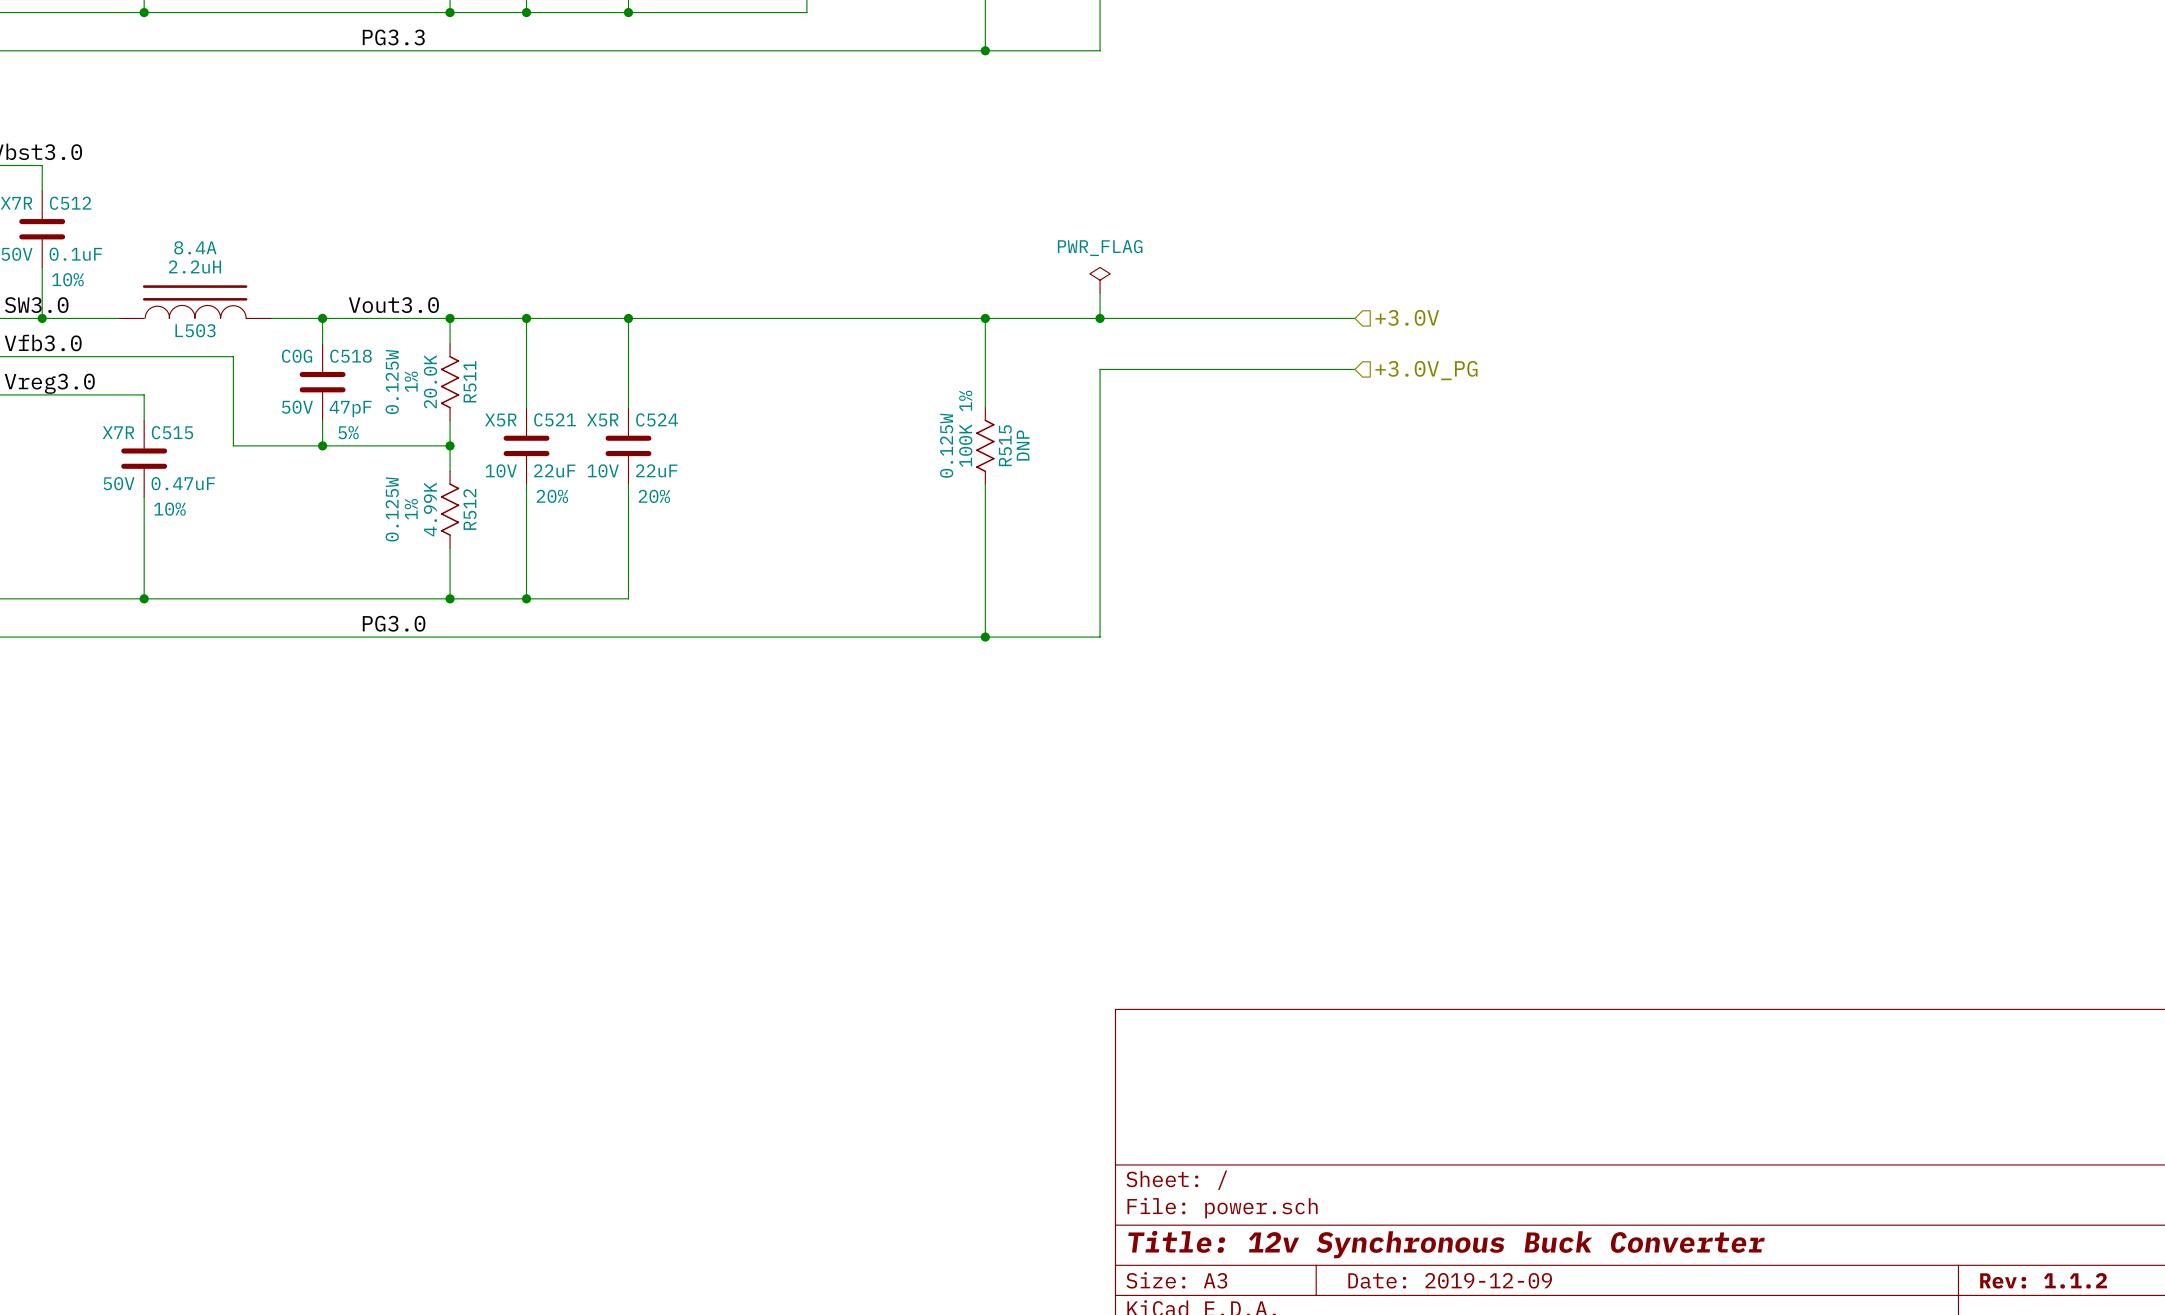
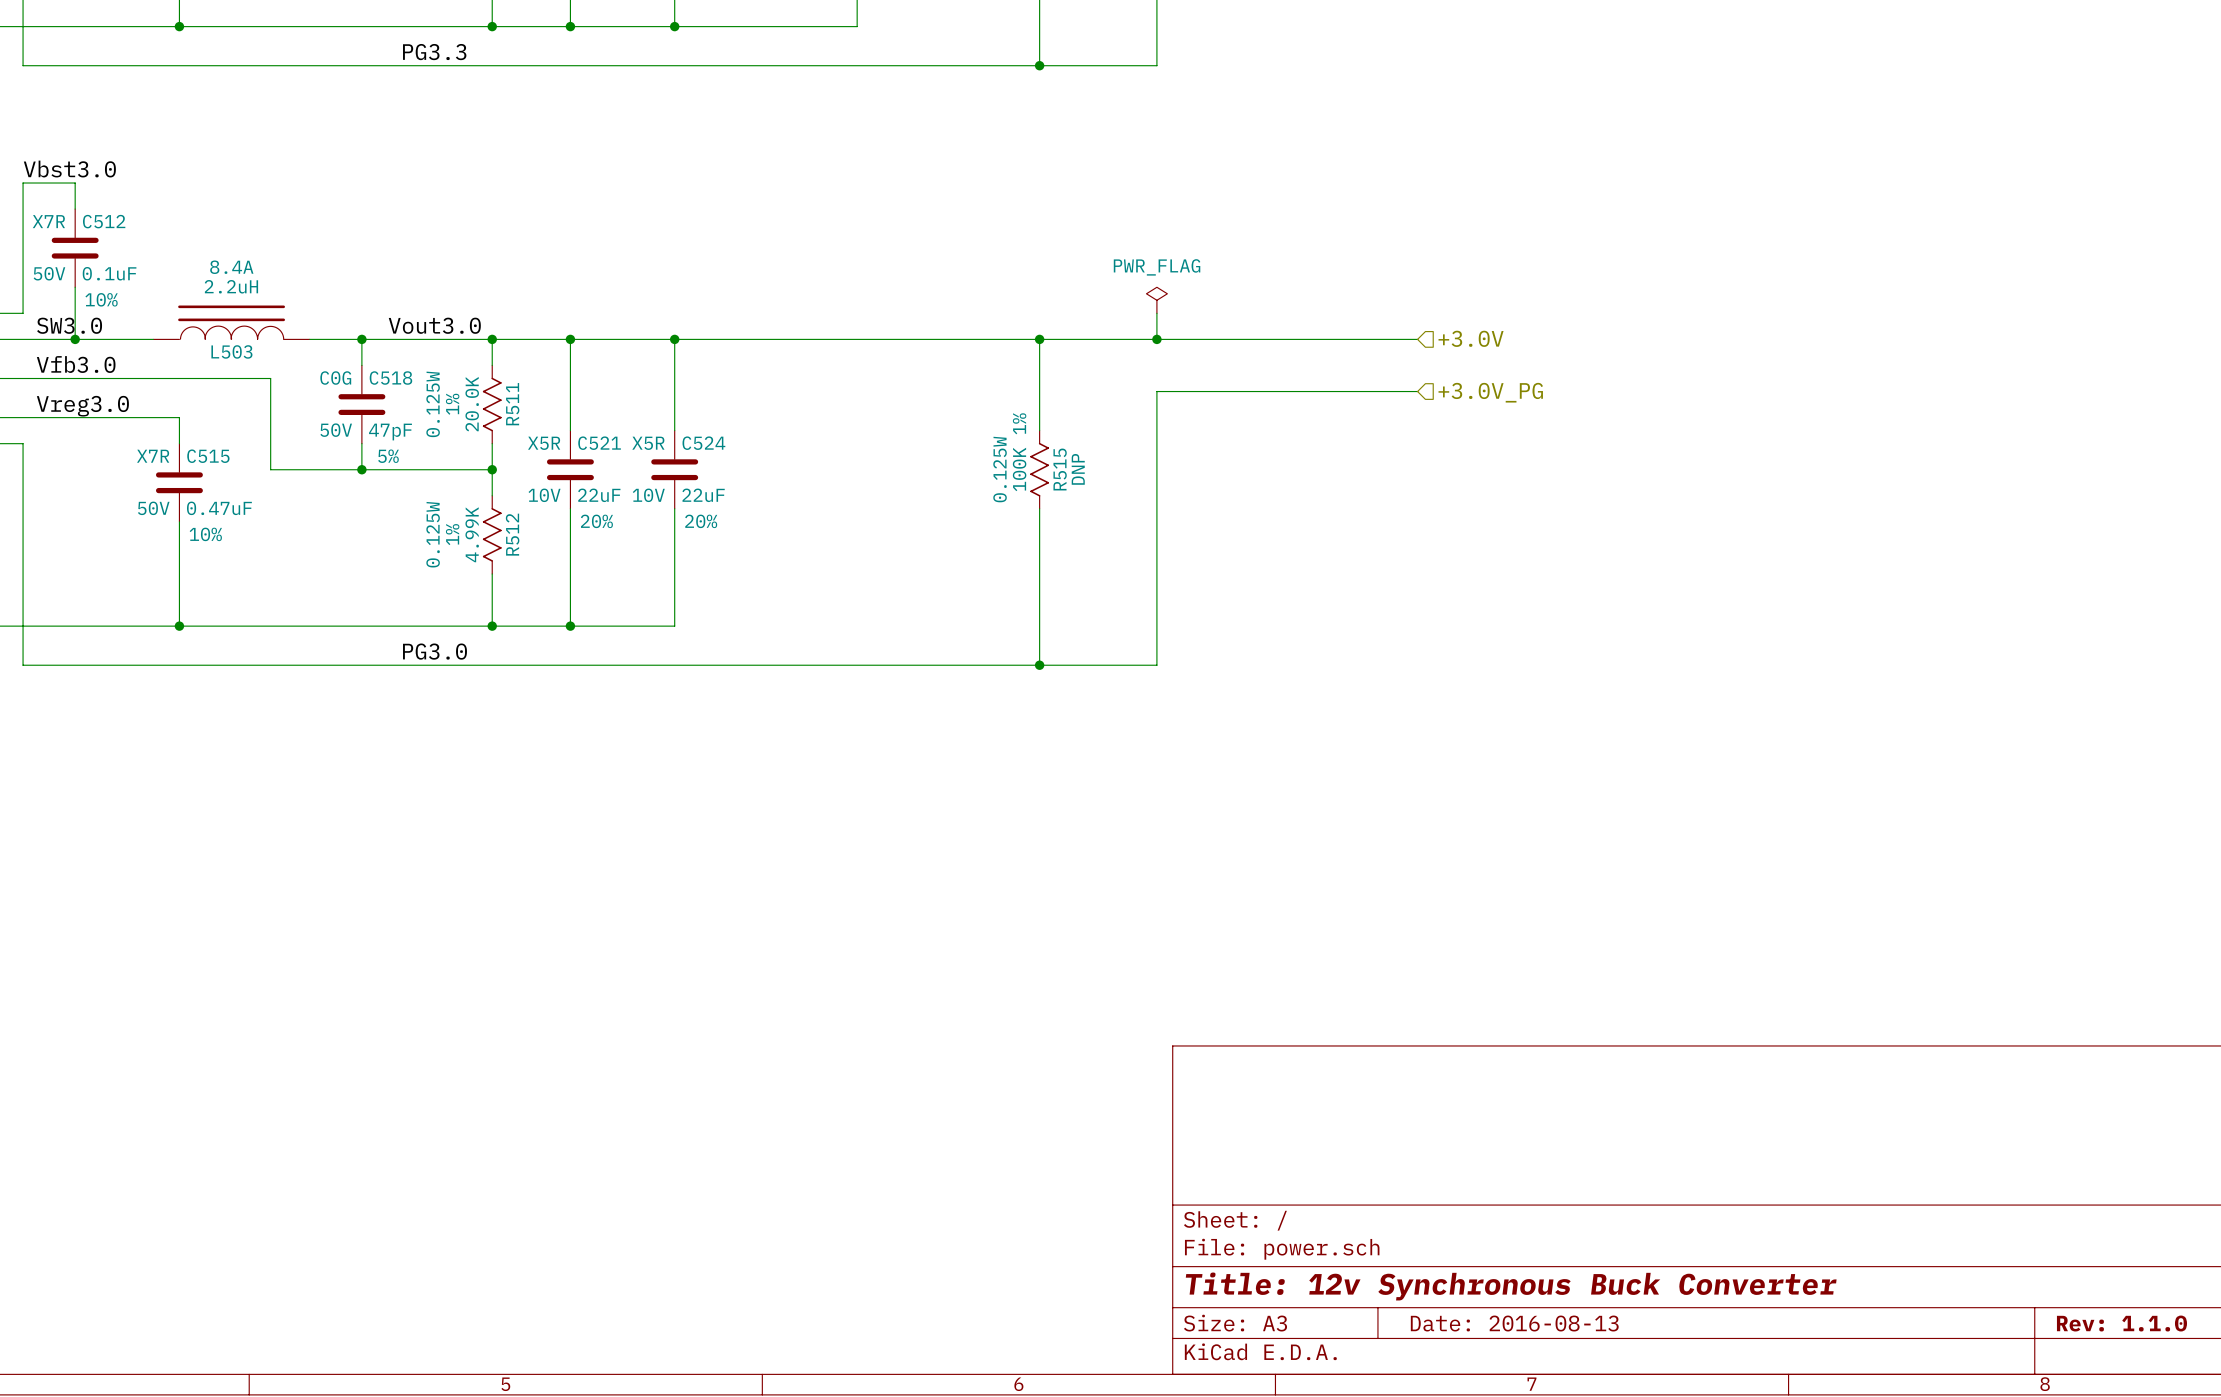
title block: Date: 2019-12-09 (1450, 1280) -> Date: 2016-08-13 (1514, 1323)
title block: Rev: 1.1.2 (2043, 1280) -> Rev: 1.1.0 (2121, 1323)

